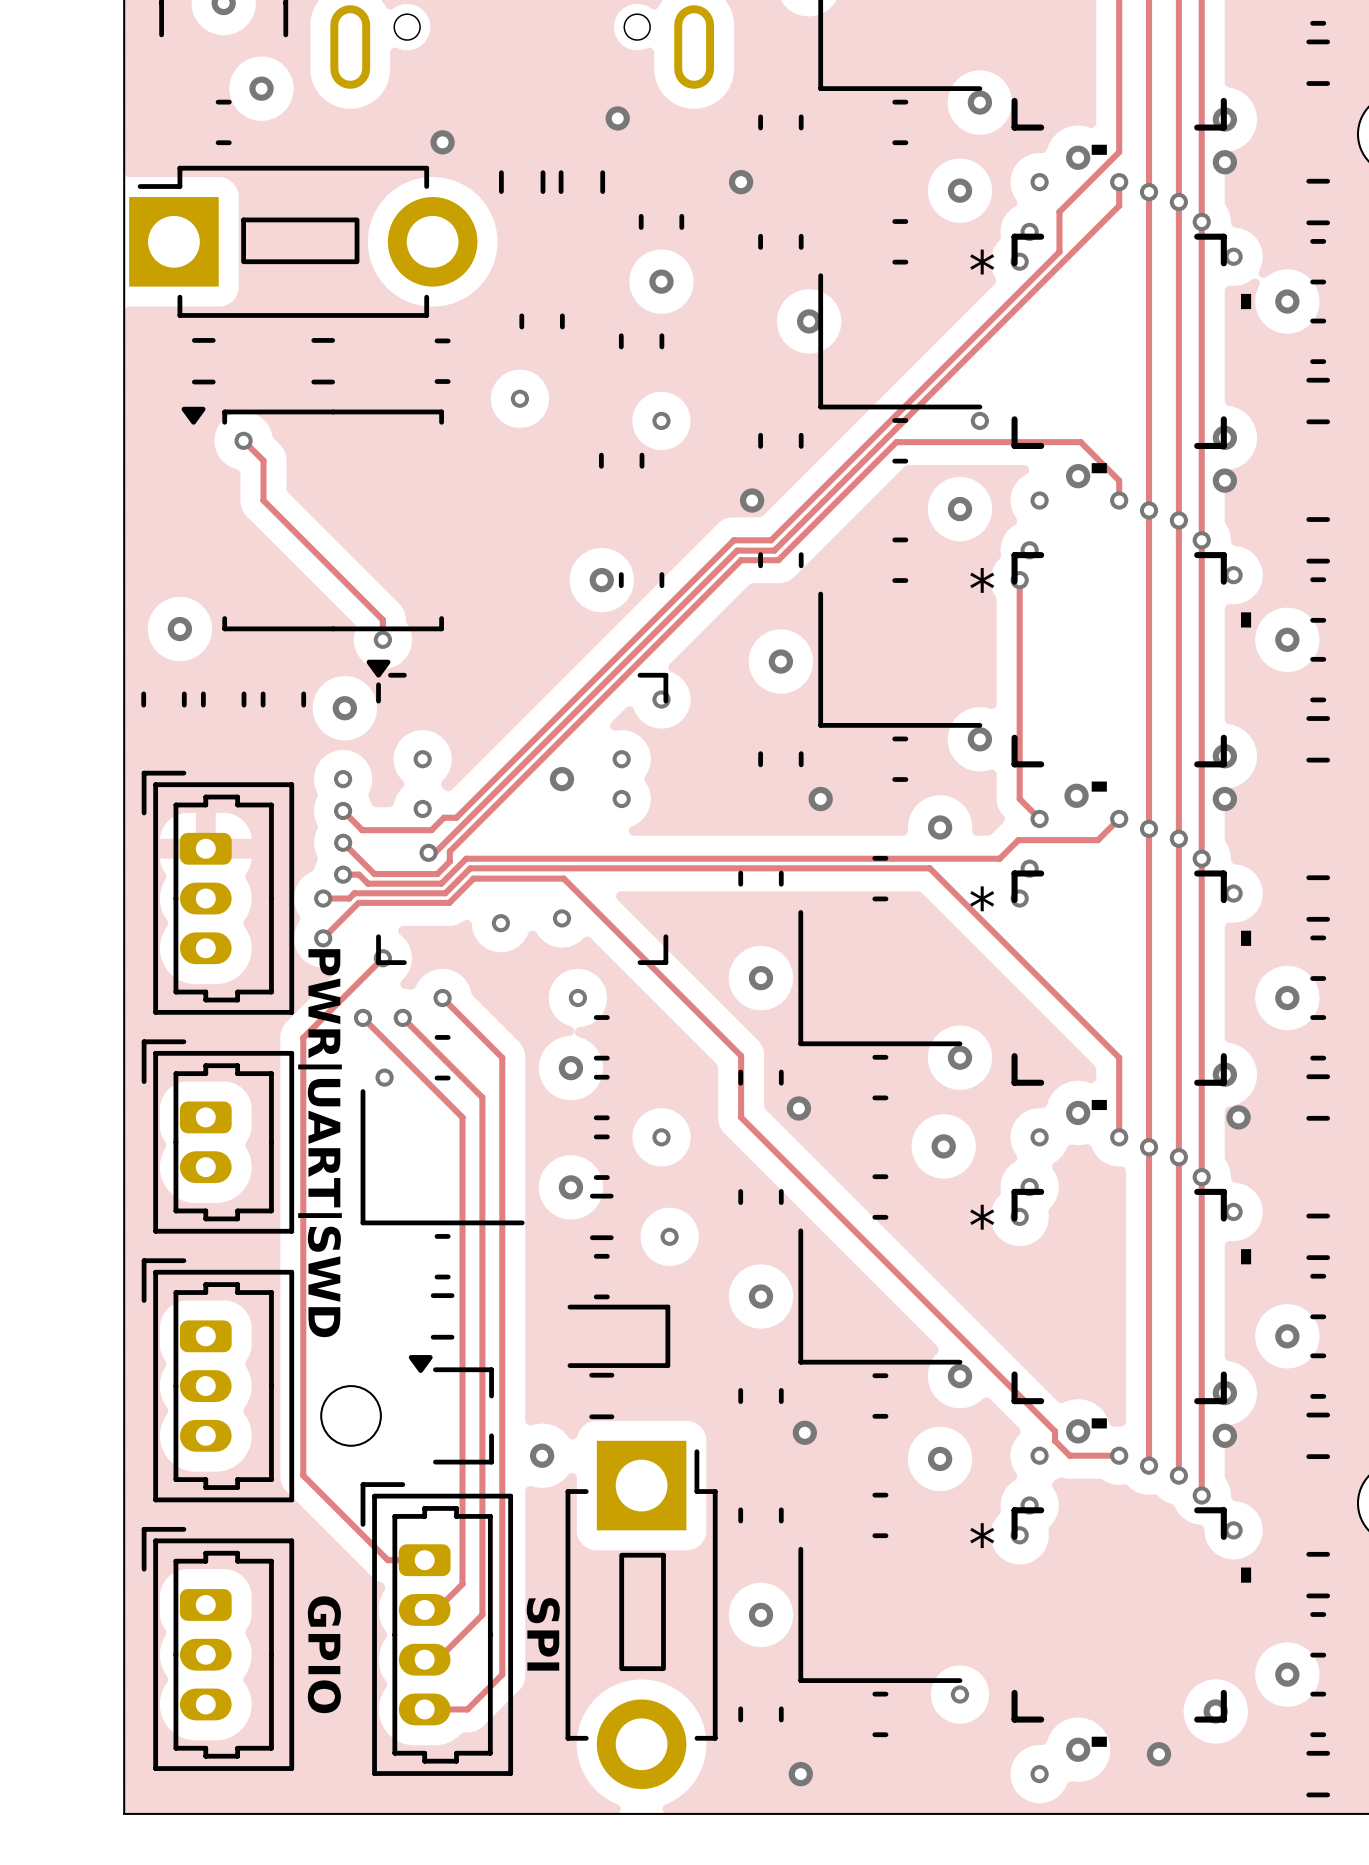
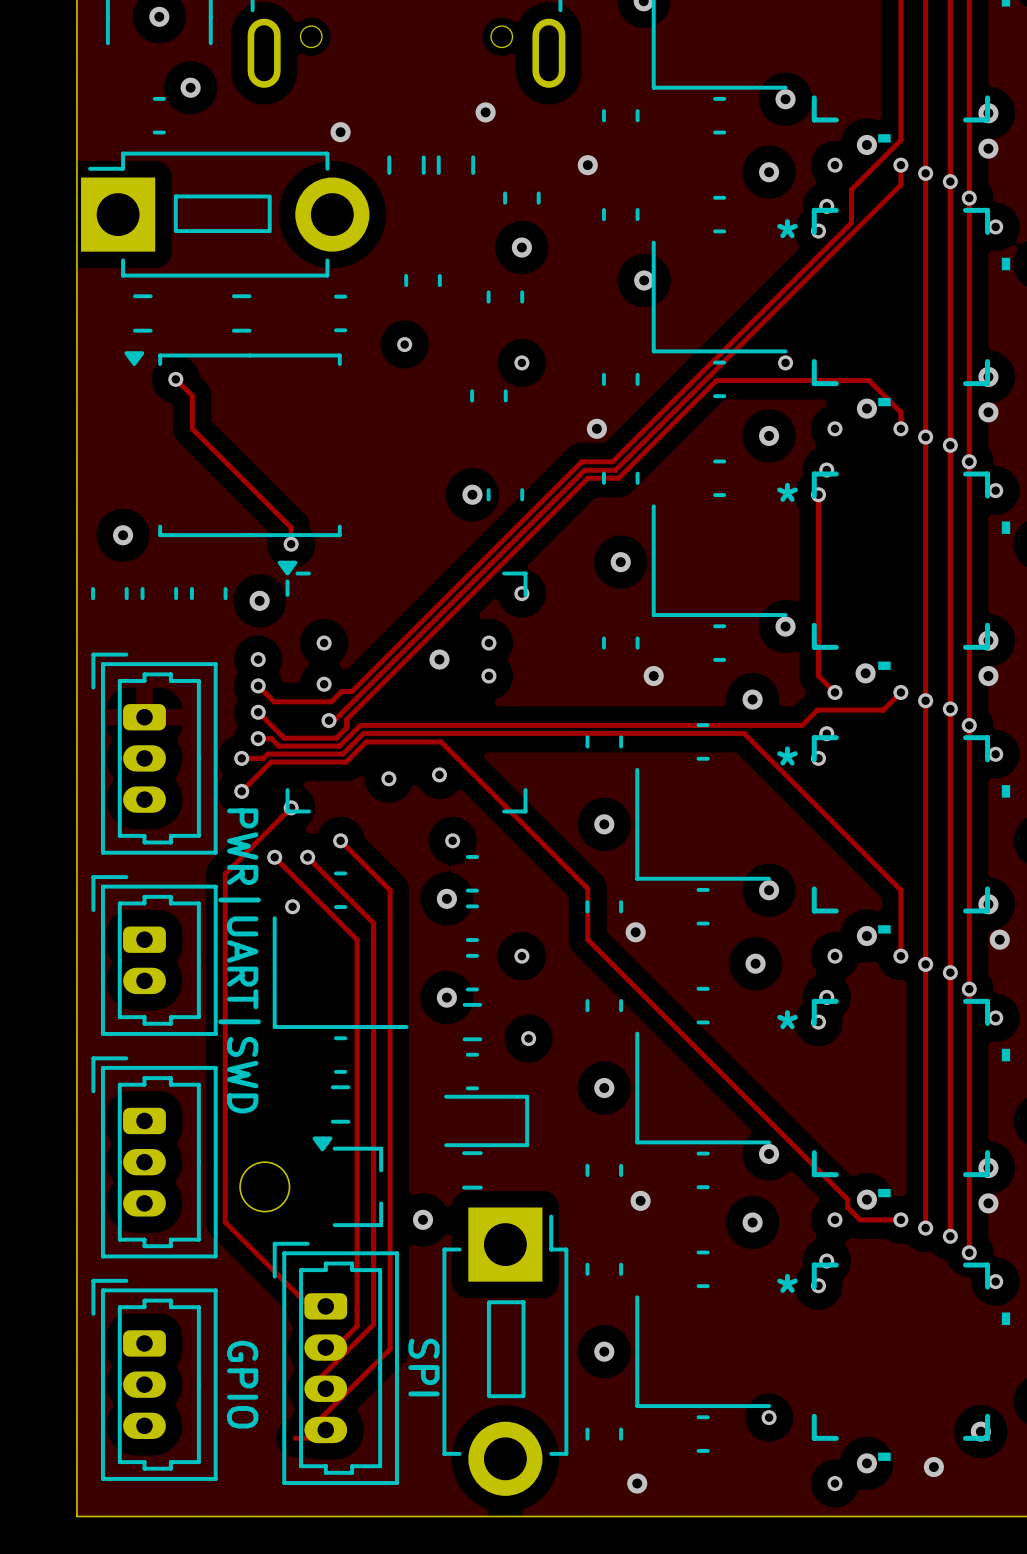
track: (303, 1458) (303, 1475) (387, 1560) (424, 1560) -> (225, 1222) (309, 1306)
track: (482, 1582) (482, 1614) (437, 1659) (424, 1659) -> (373, 1324) (309, 1388)
track: (502, 1611) (502, 1674) (467, 1709) (424, 1709) -> (390, 1349) (309, 1429)
track: none -> (295, 1438) (309, 1438)

